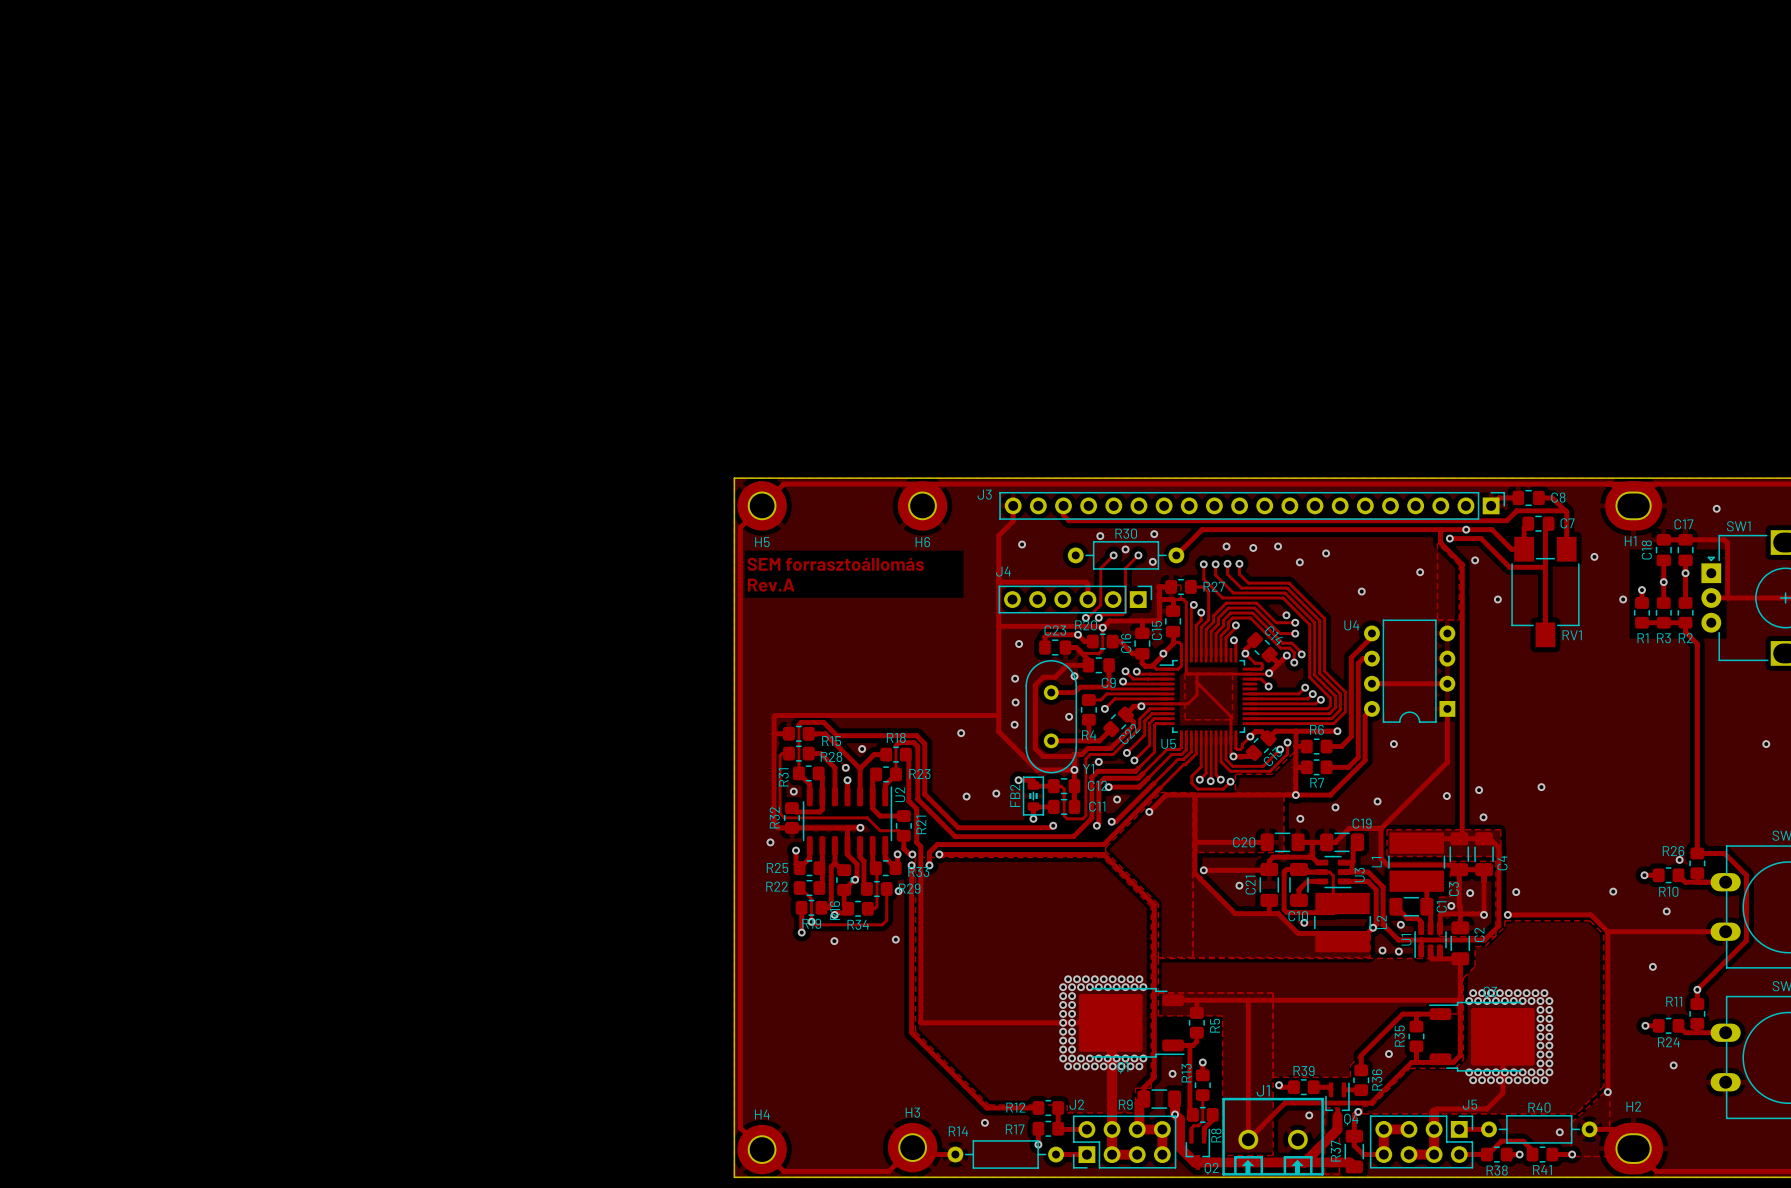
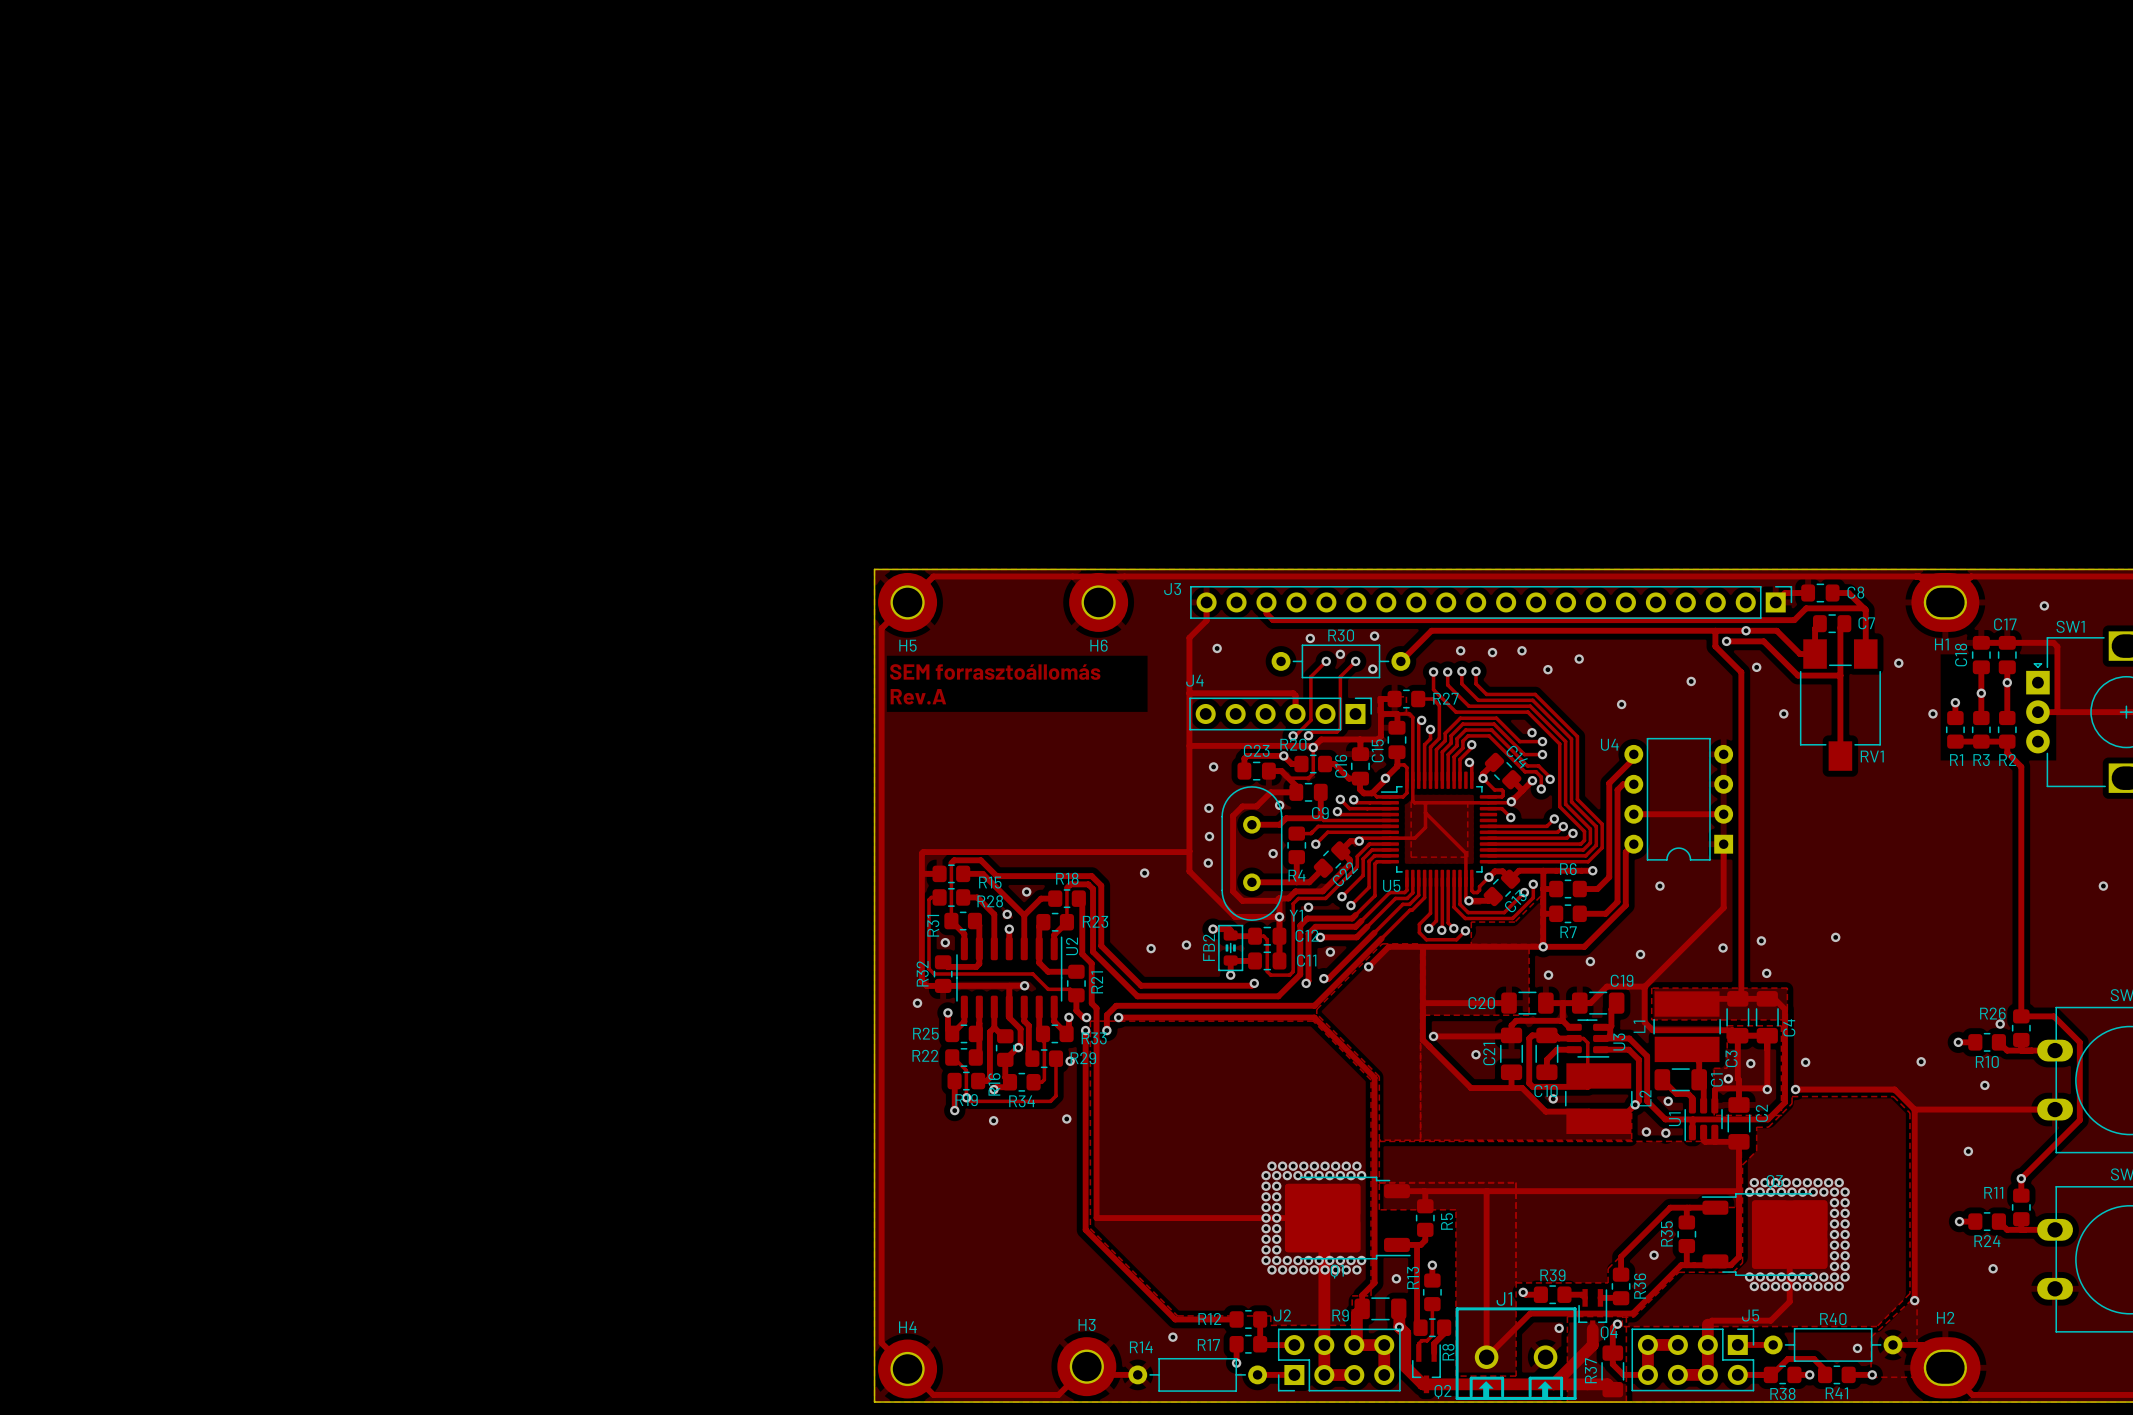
zone outline: (1437, 543) (1459, 565) (1459, 619) (1437, 619) (1437, 543) -> none
zone outline: (1324, 1107) (1339, 1107) (1339, 1174) (1324, 1174) (1324, 1107) -> none
zone outline: none -> (1567, 1402) (1567, 1316) (1626, 1316) (1626, 1402)

